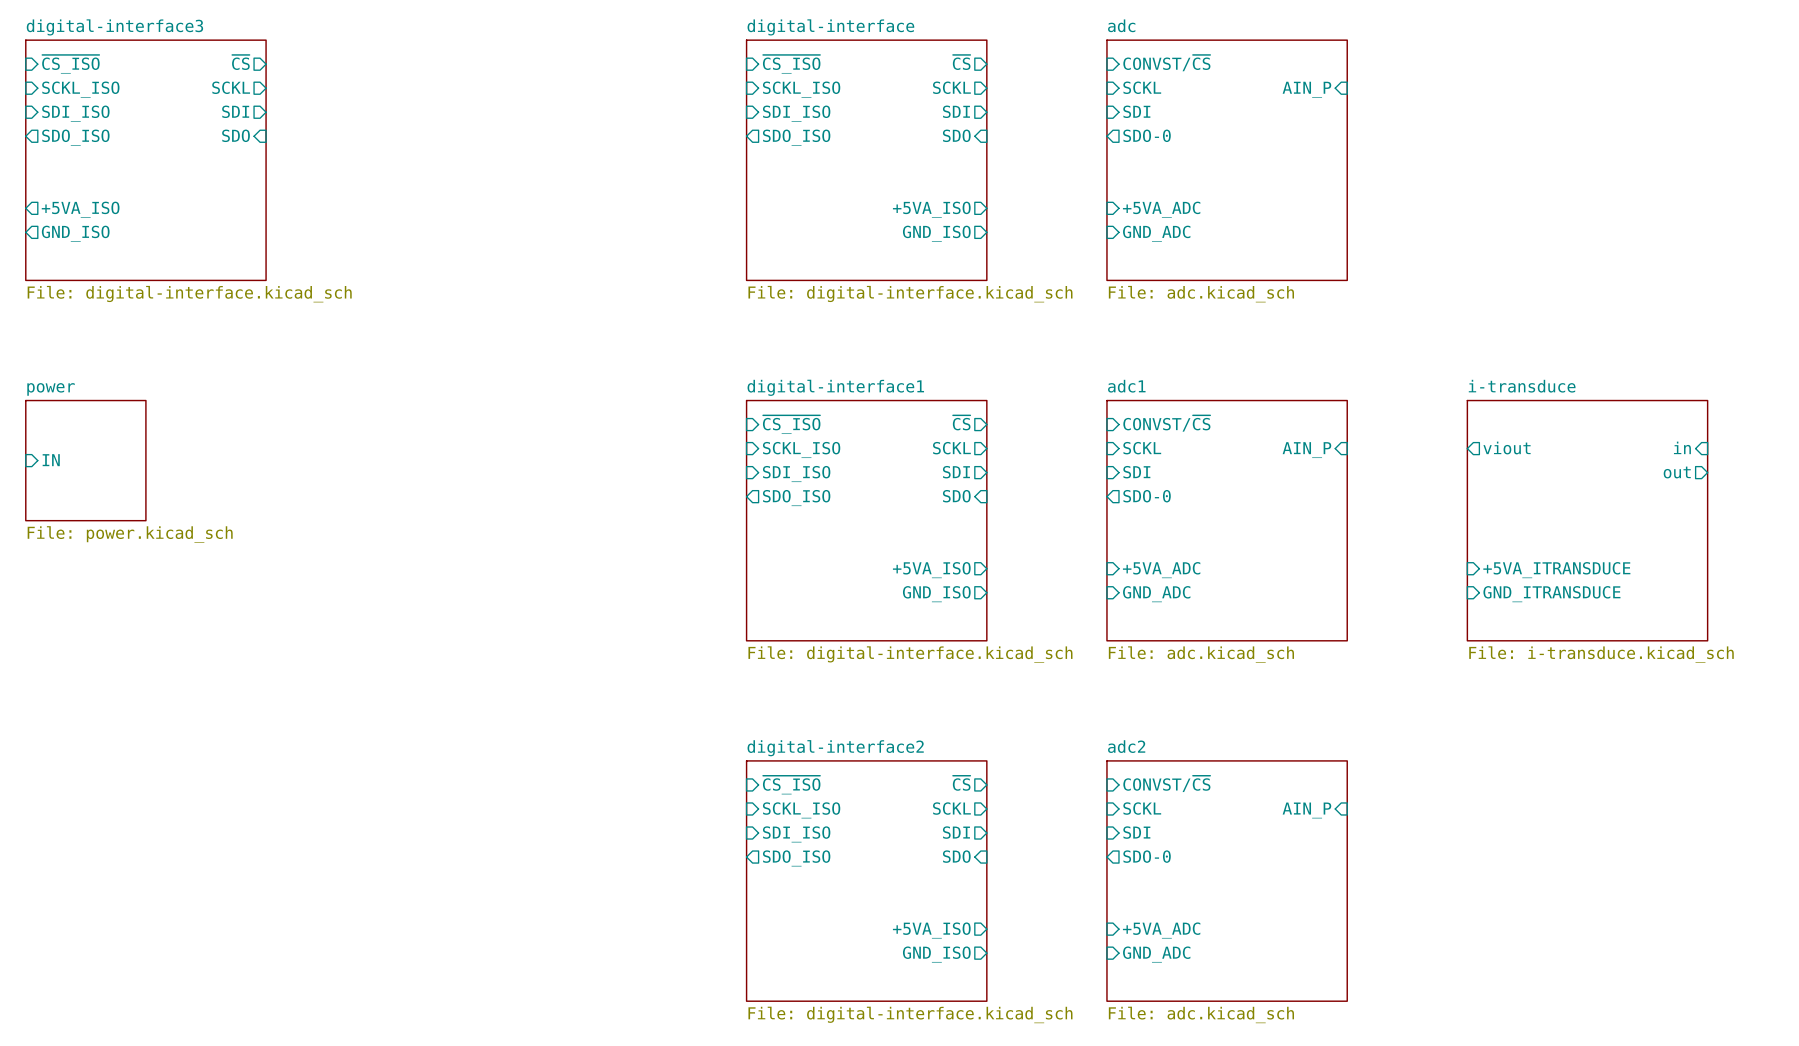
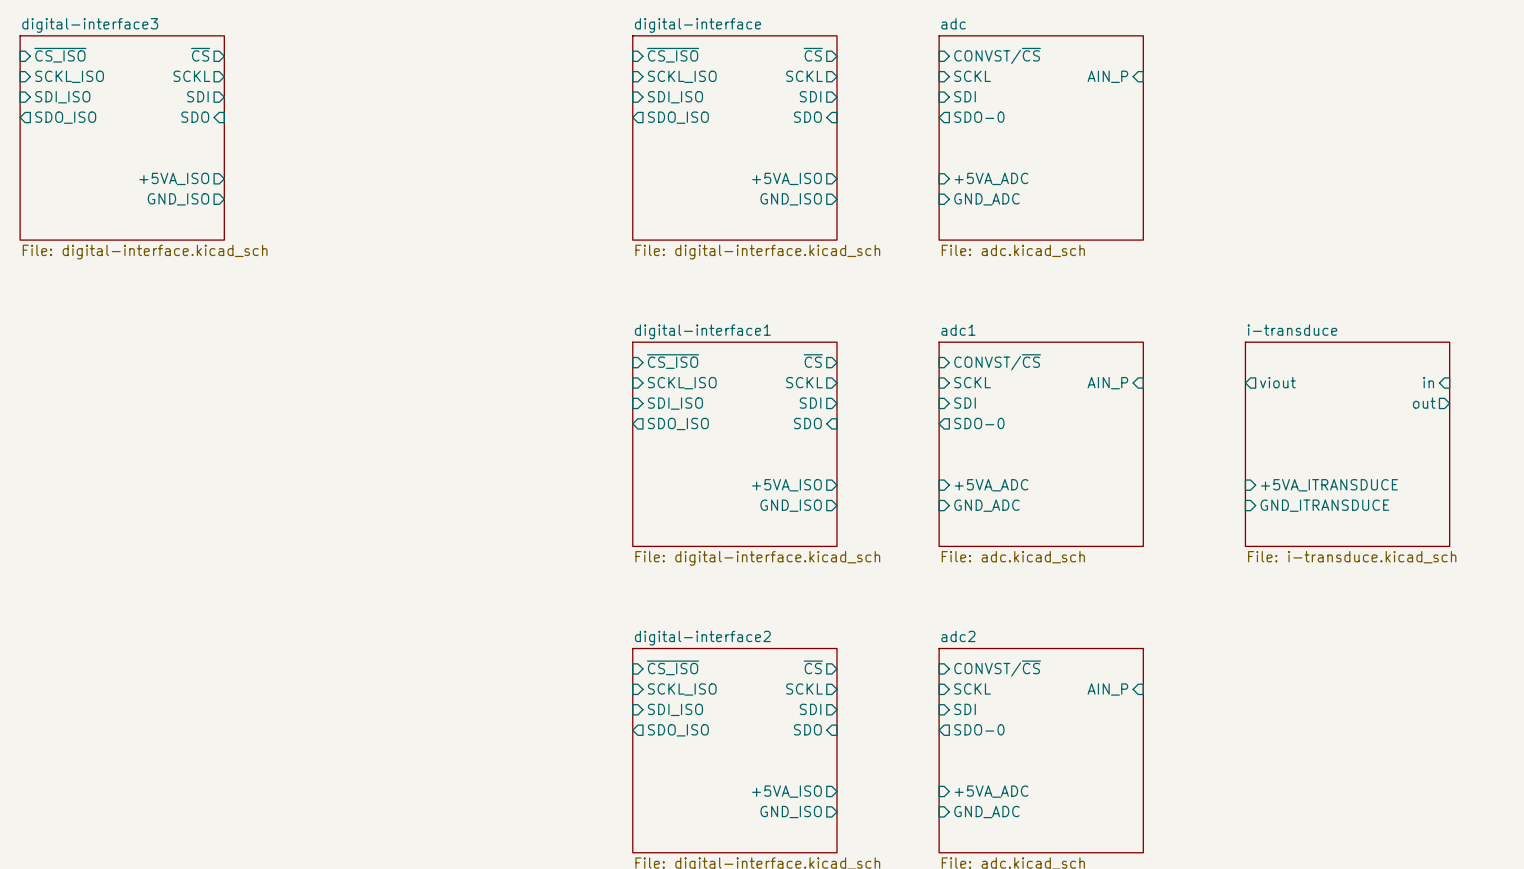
sheet pin rotation: 0° (80, 209) -> 180° (174, 178)
sheet pin position: +5VA_ISO (80, 209) -> +5VA_ISO (174, 178)
sheet pin rotation: 0° (75, 233) -> 180° (178, 199)
sheet pin position: GND_ISO (75, 233) -> GND_ISO (178, 199)
sheet pin: IN (51, 460) -> none
sheet power: File: power.kicad_sch (85, 460) -> none

